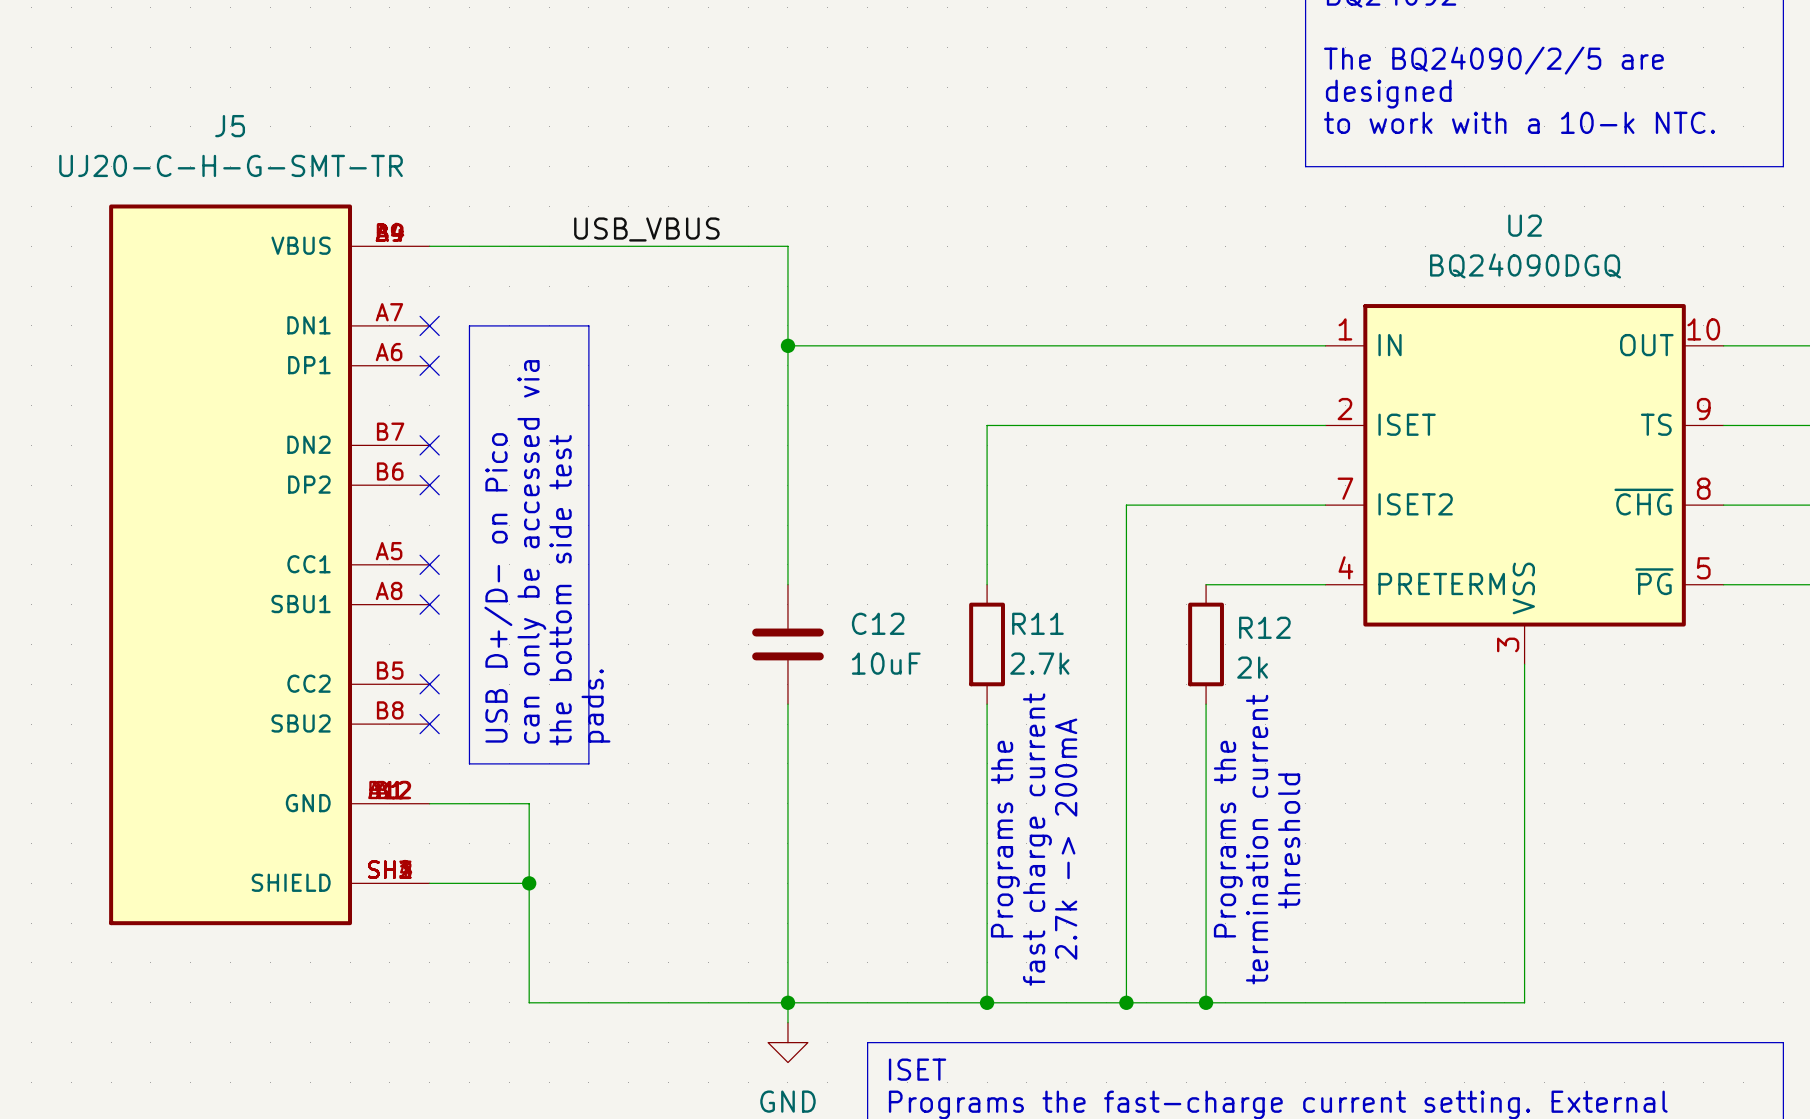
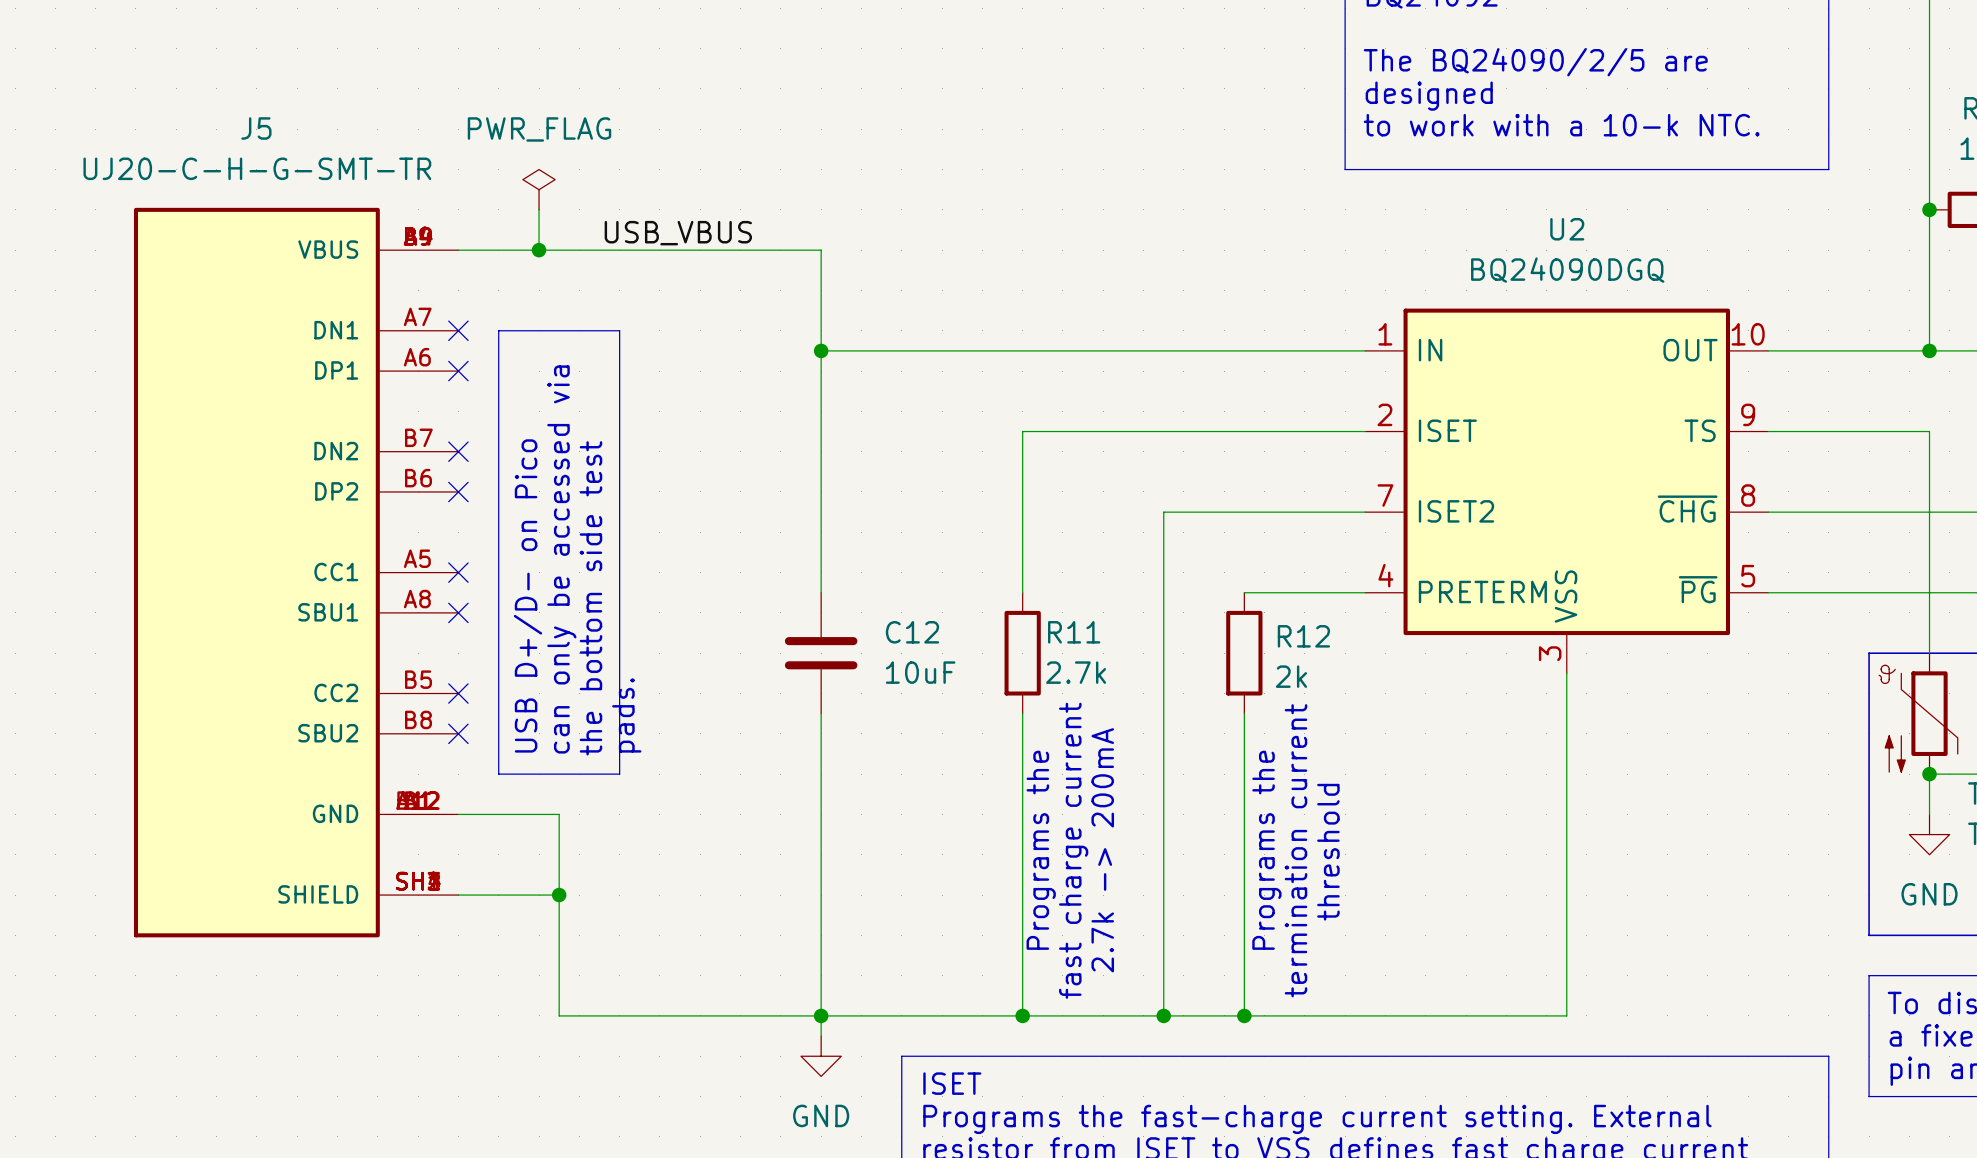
power symbol: none -> PWR_FLAG (539, 189)
wire: none -> (539, 209) (539, 250)
junction: none -> (539, 250)

